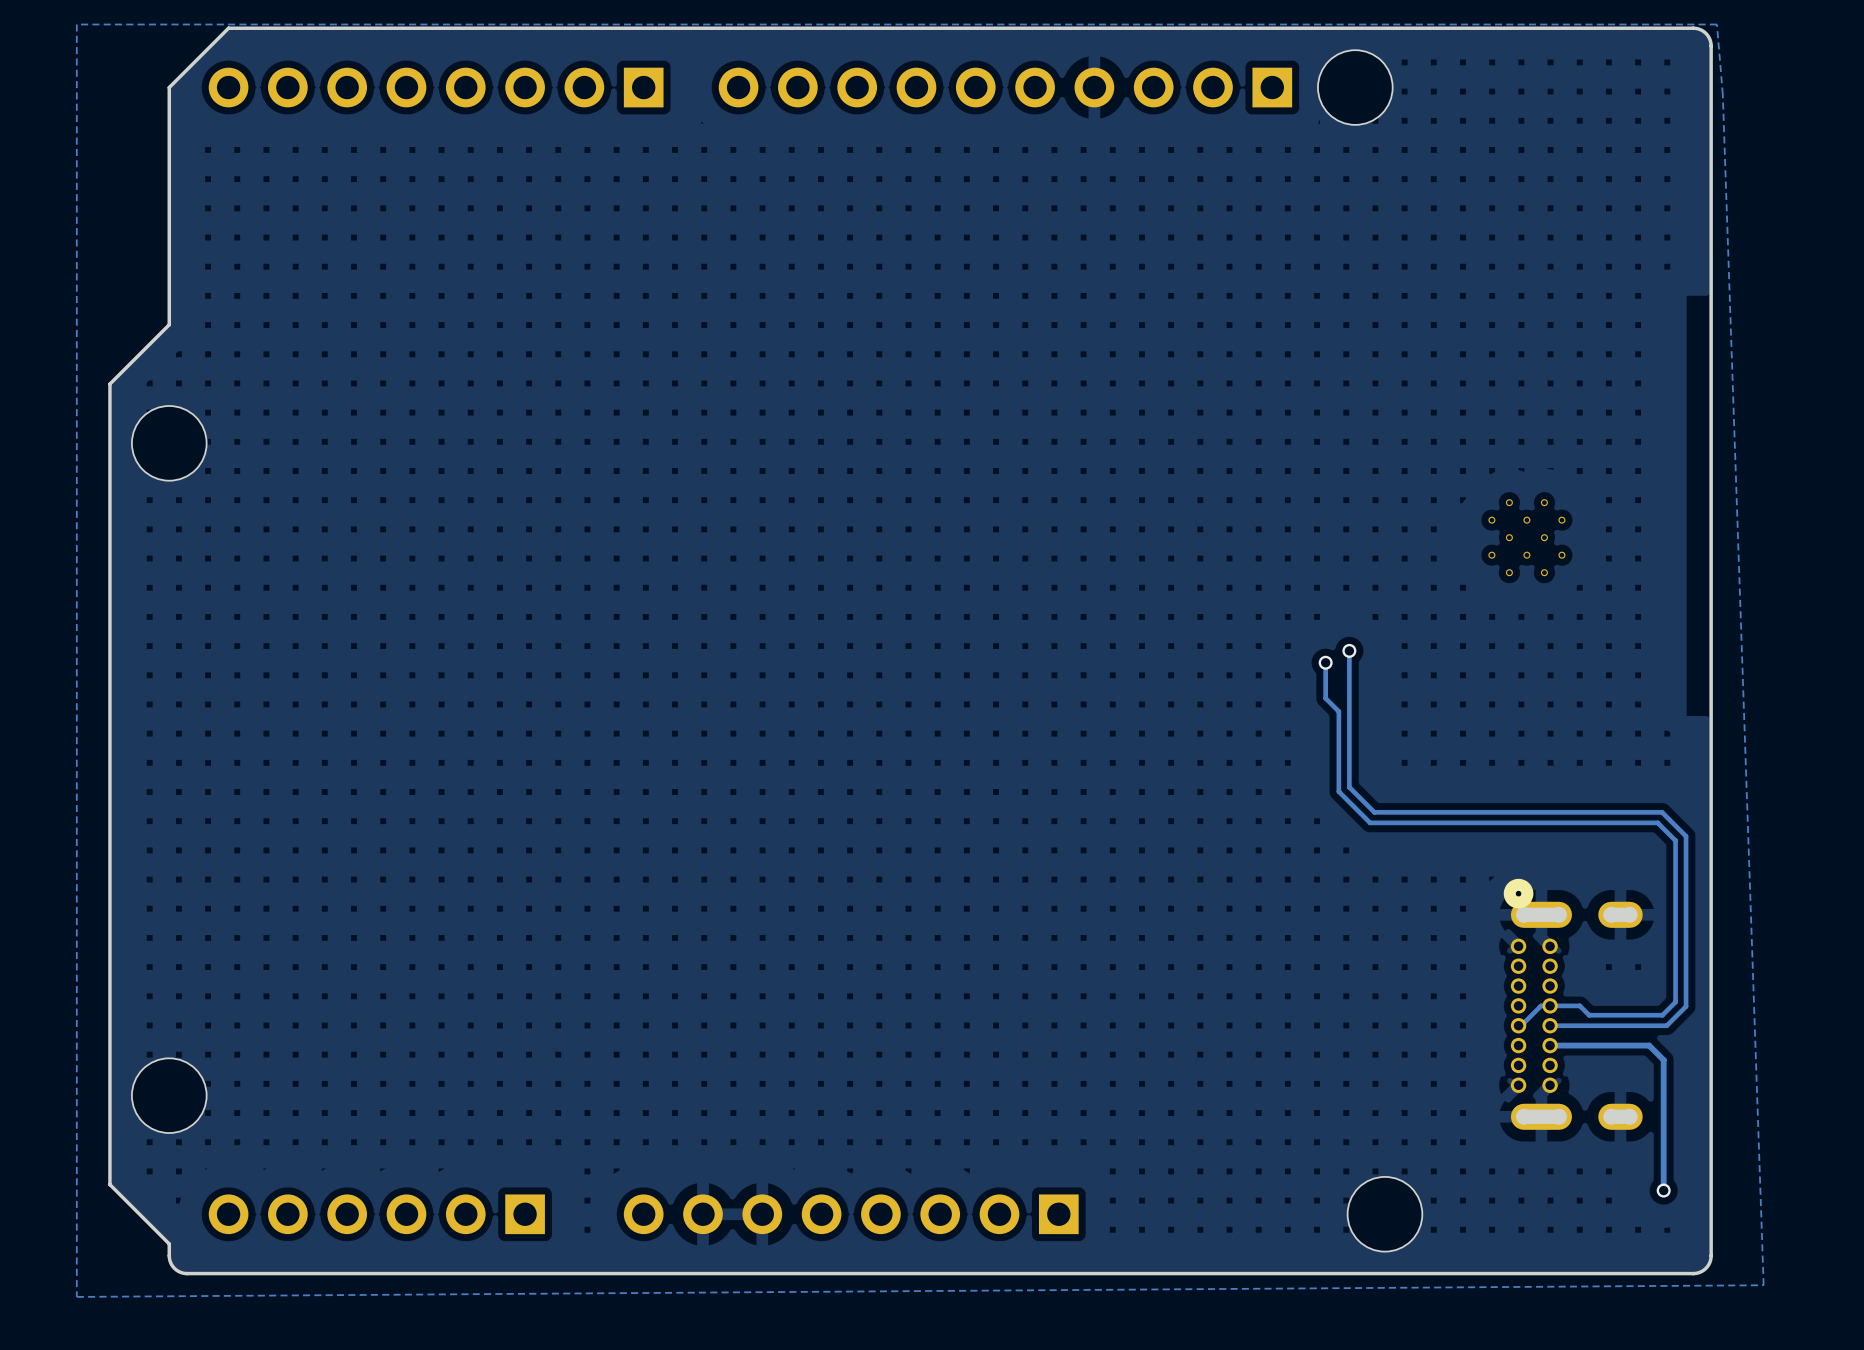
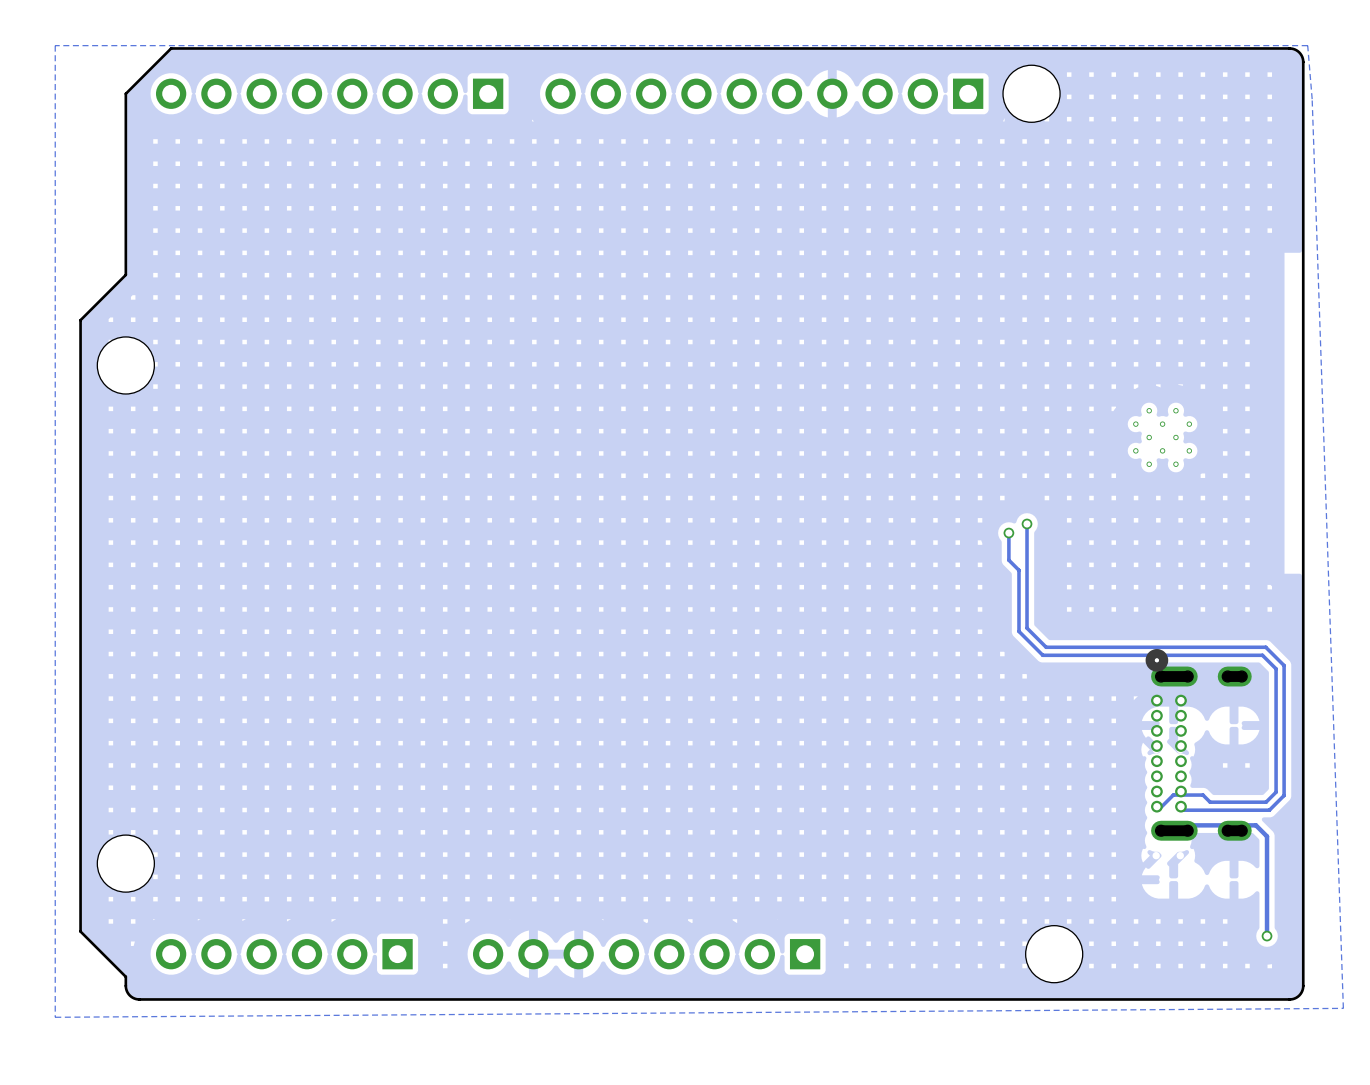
part position: (1573, 1004) -> (1198, 744)

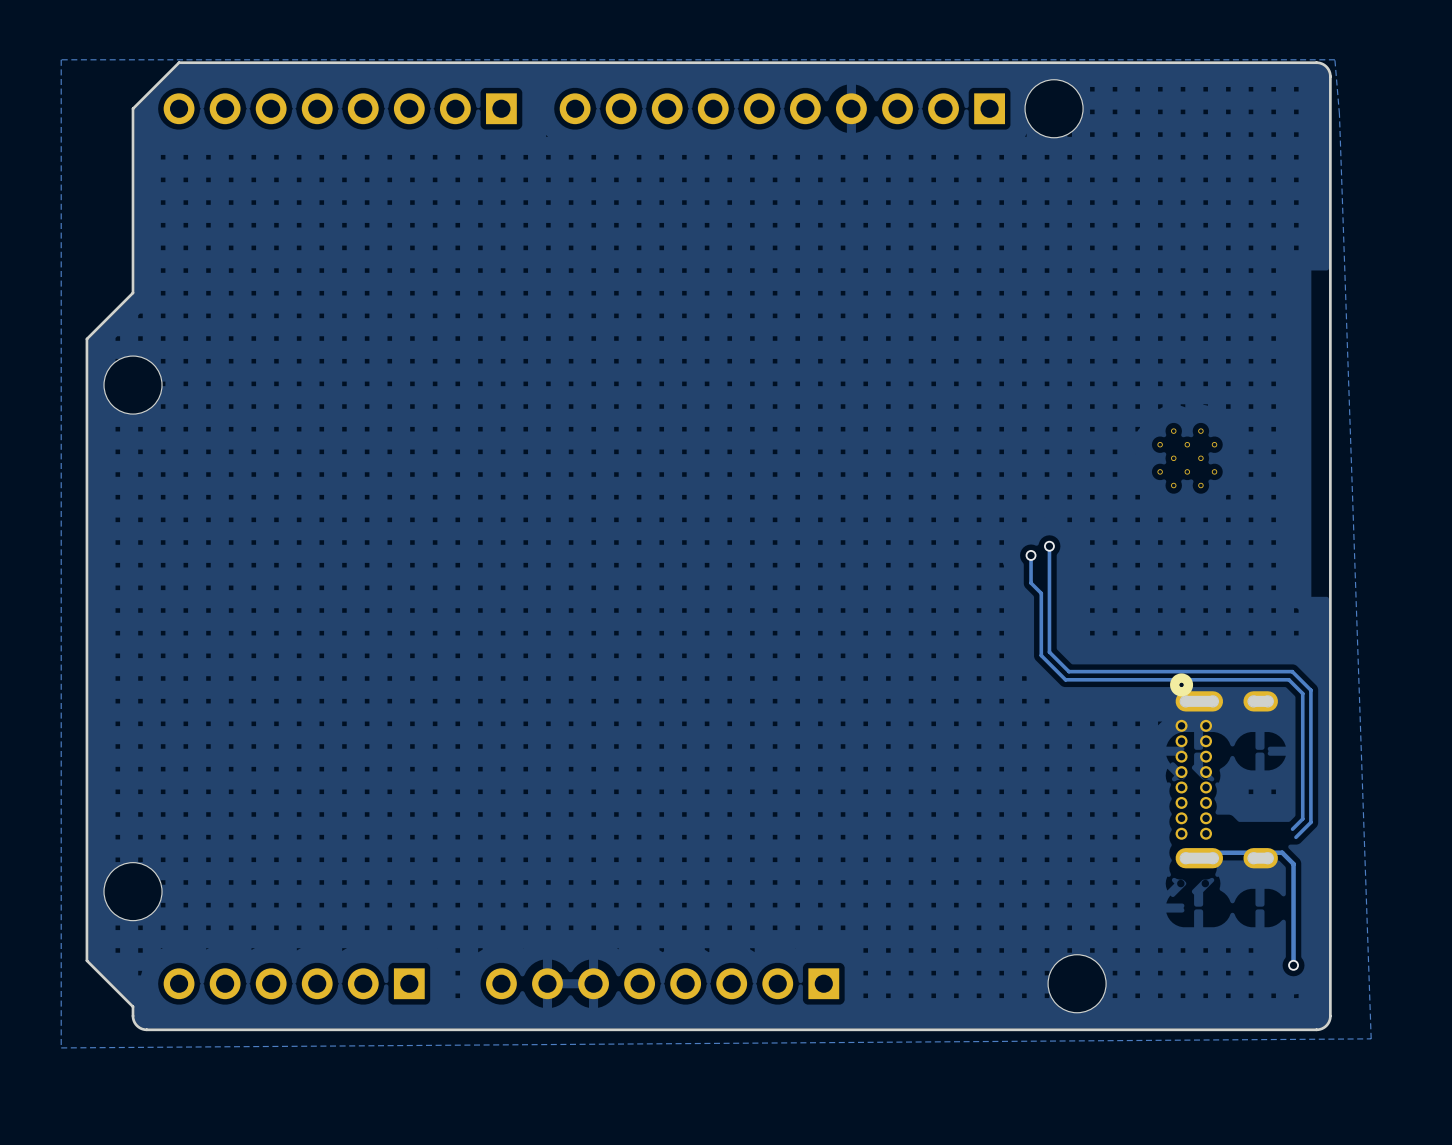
track: (1266, 802) (1210, 802) (1202, 795) (1173, 795) (1158, 810) -> none
track: (1269, 810) (1180, 810) -> none

